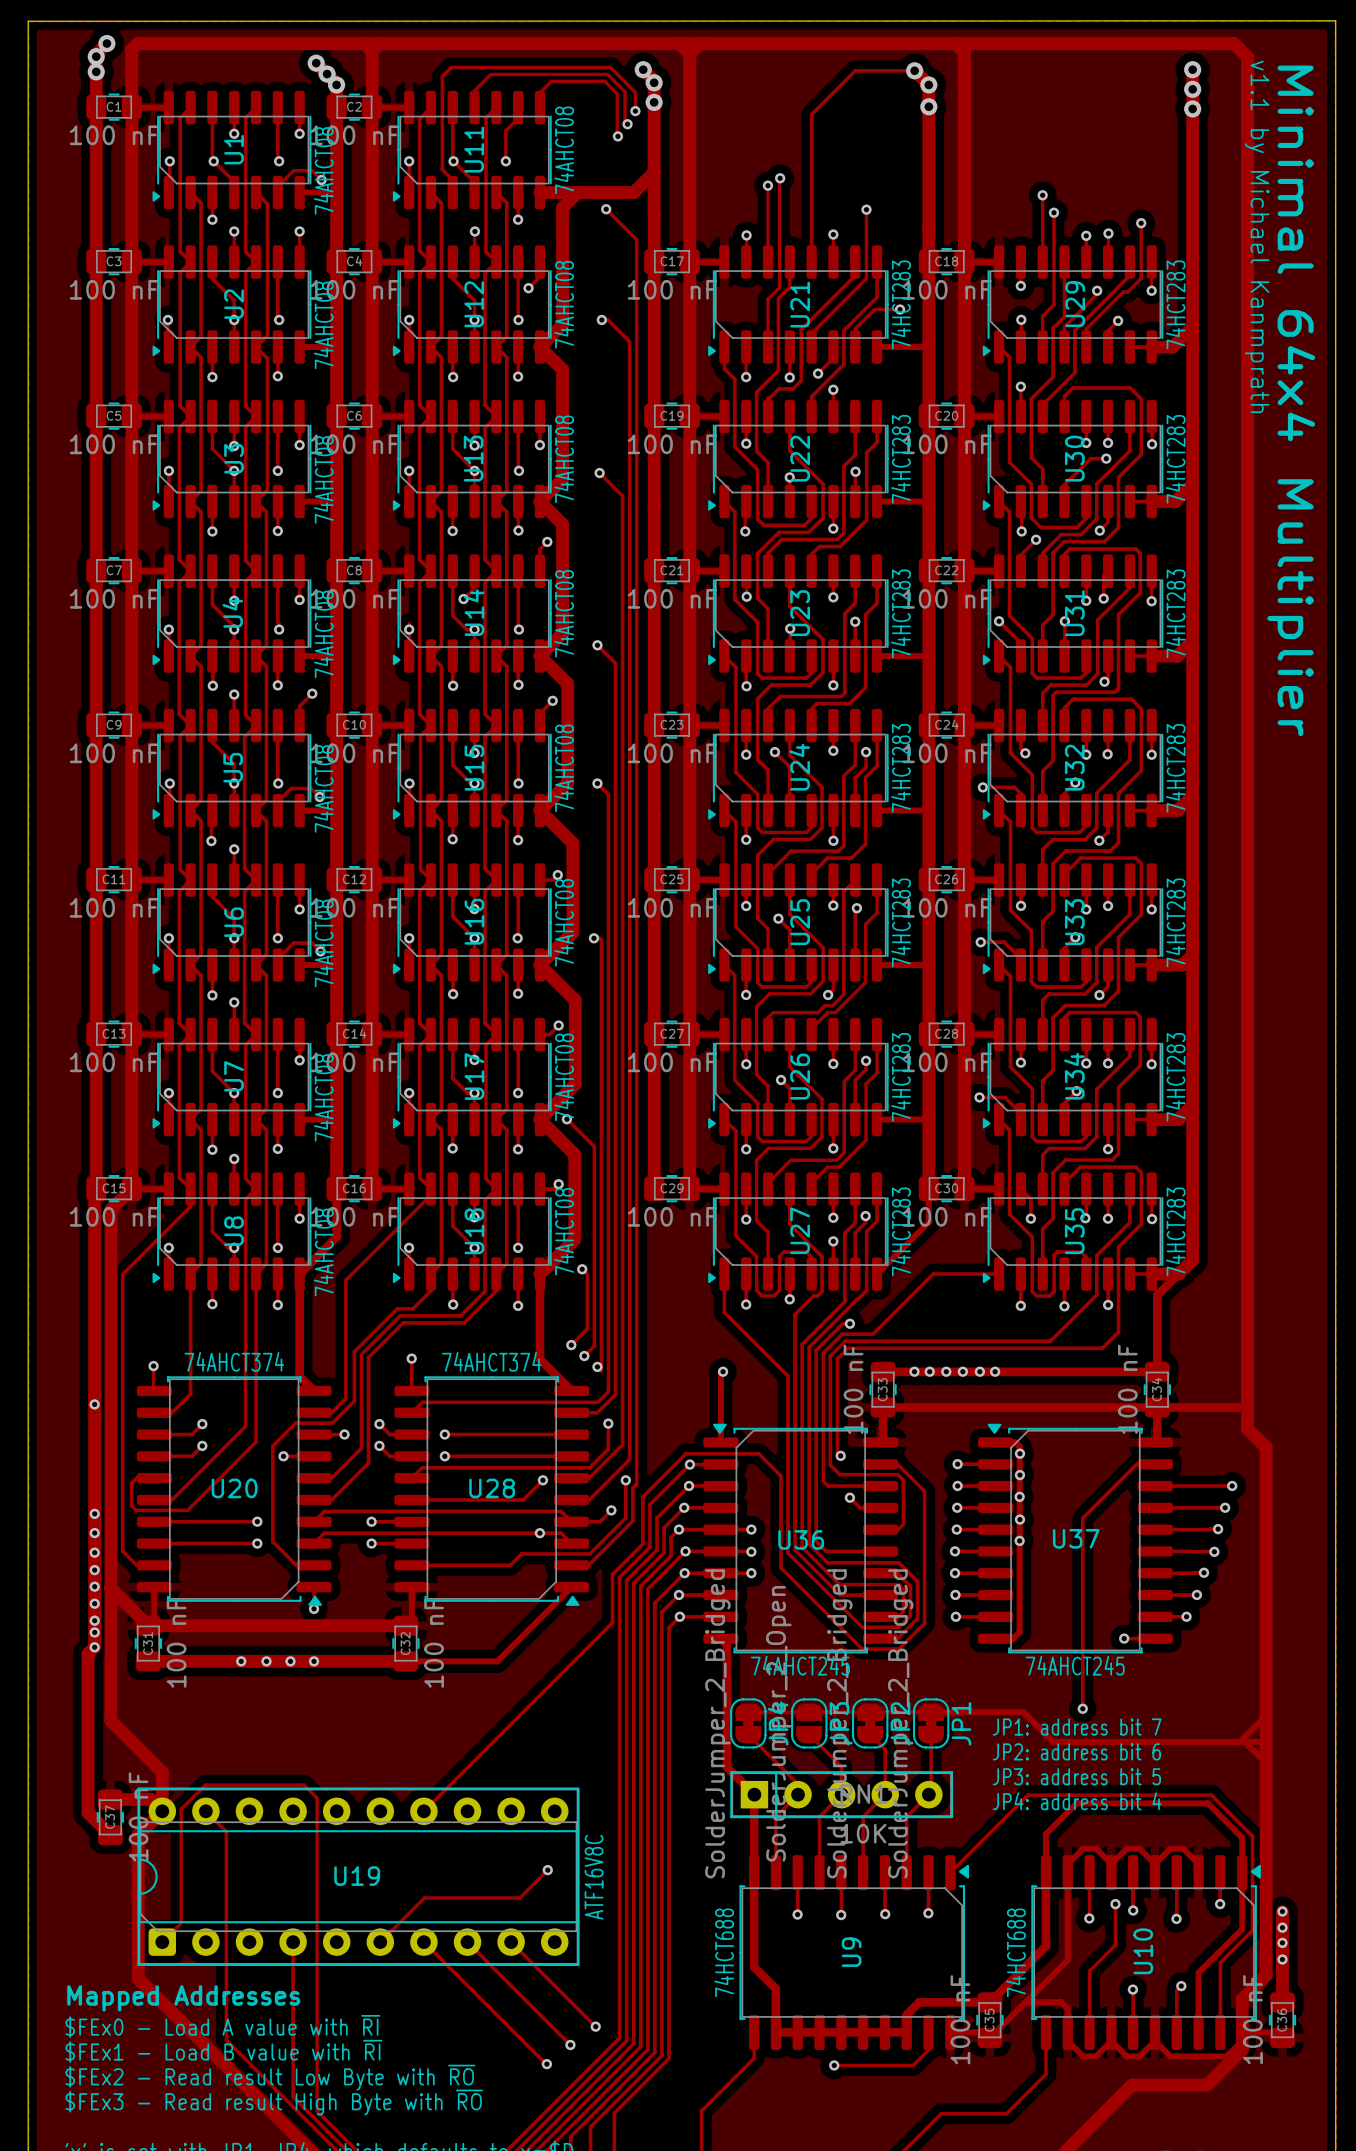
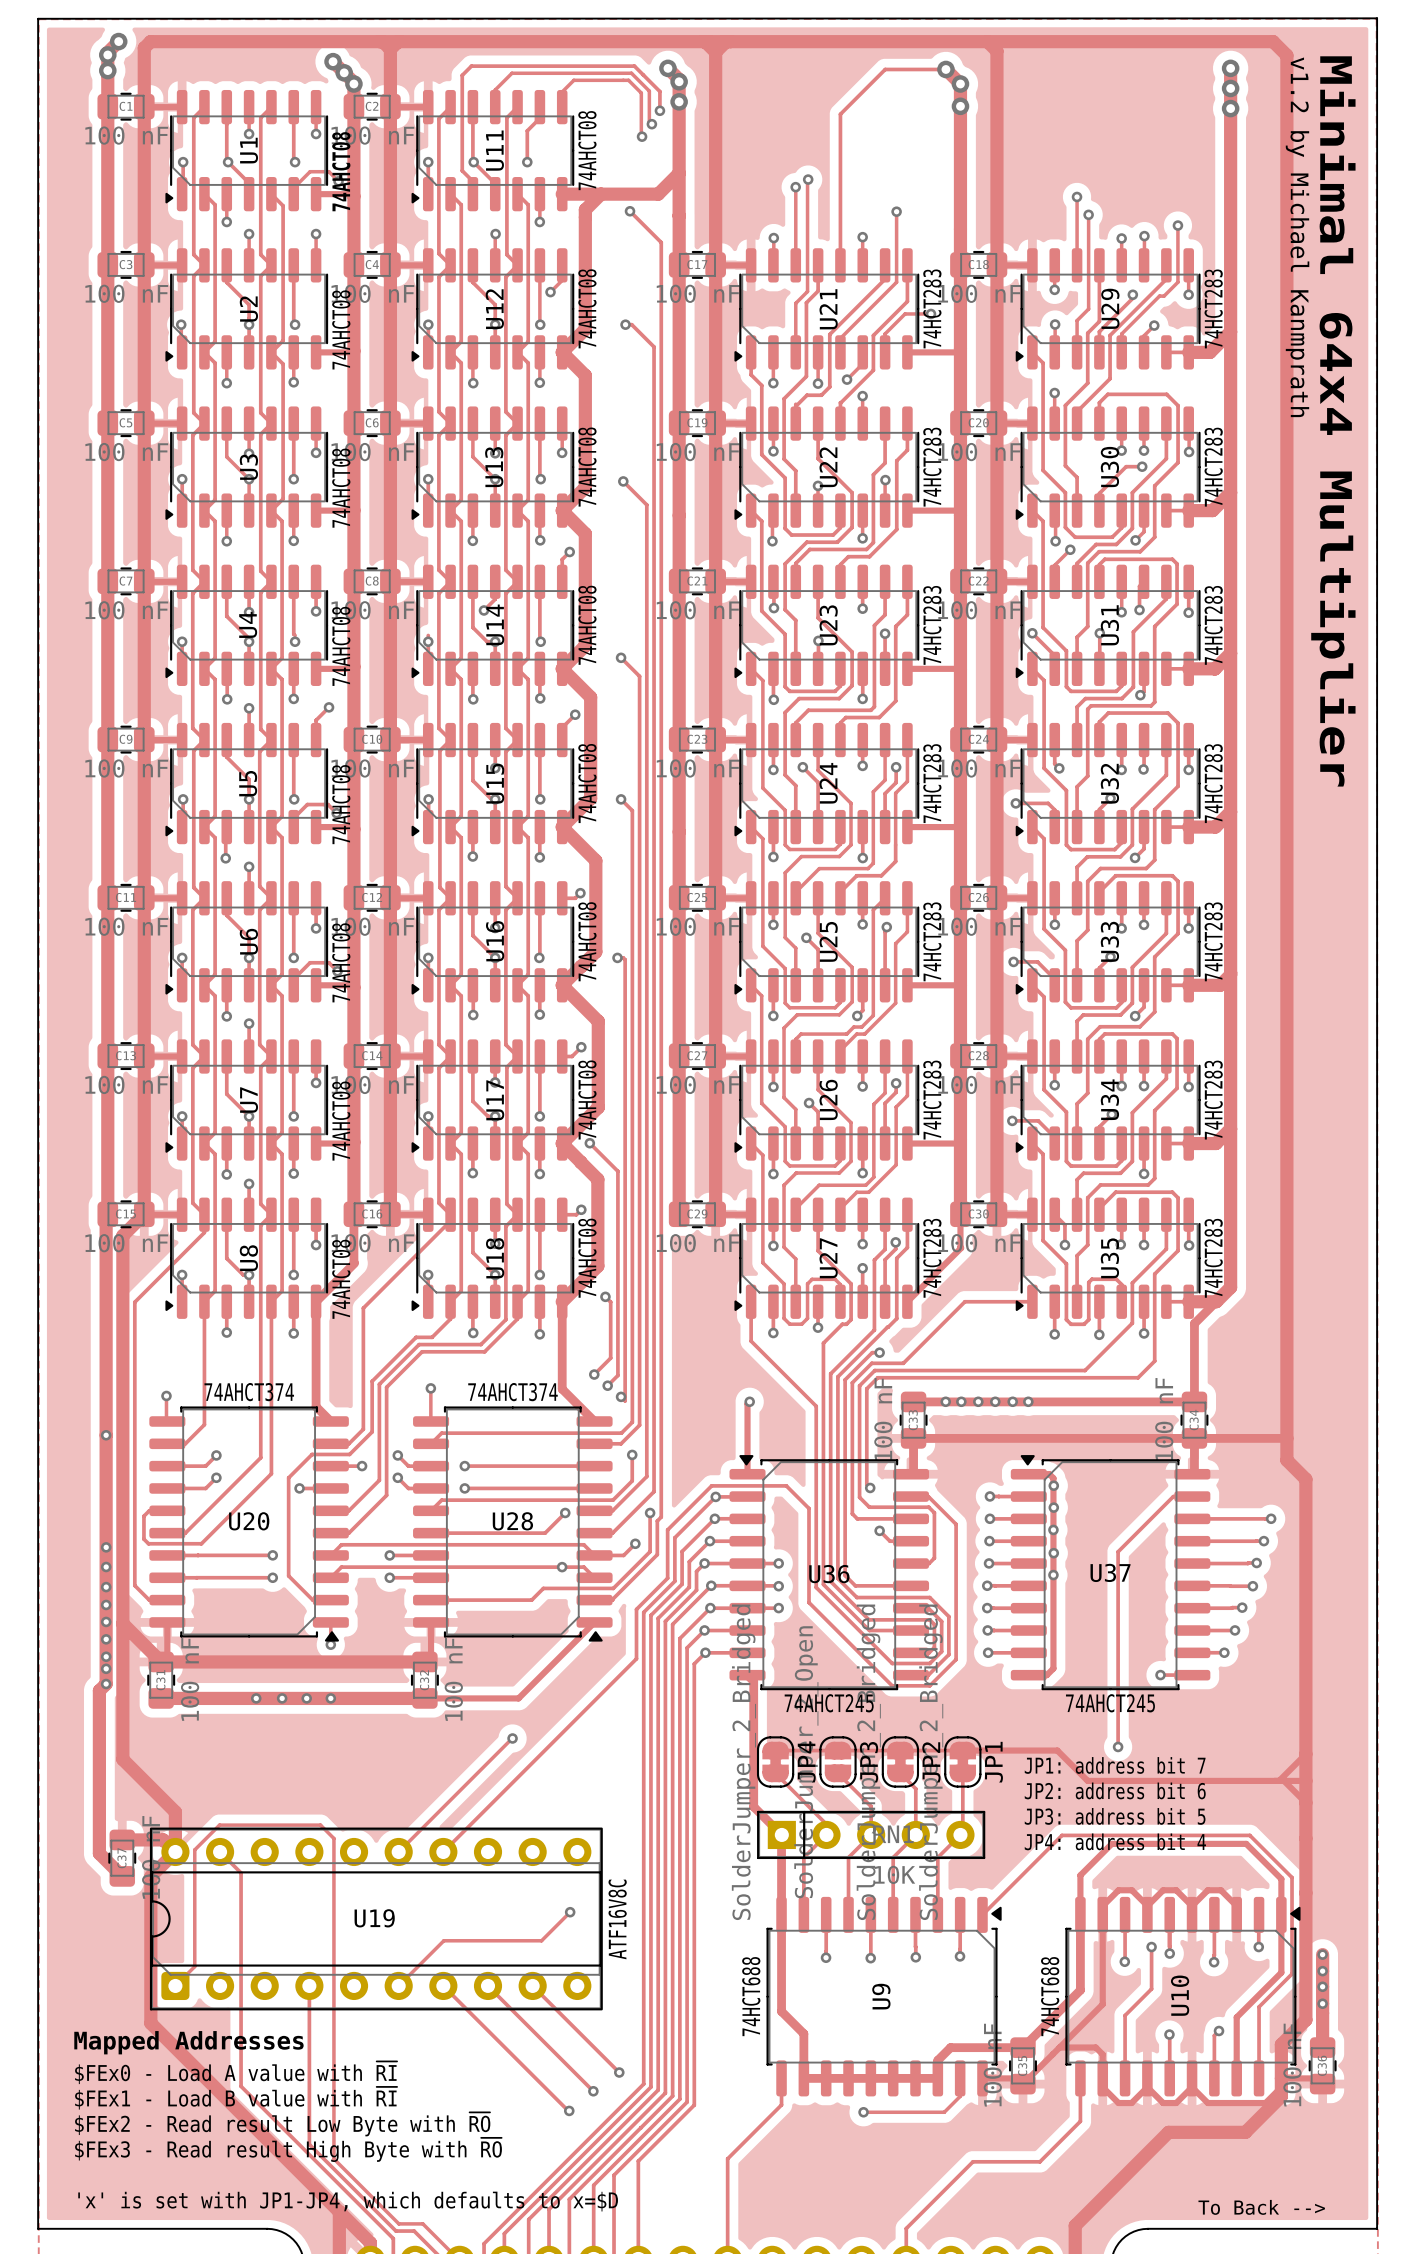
text: v1.1 by Michael Kanmprath (1257, 236) -> v1.2 by Michael Kanmprath (1297, 237)
track: none -> (512, 1738) (398, 1851)
via: none -> (512, 1738)

